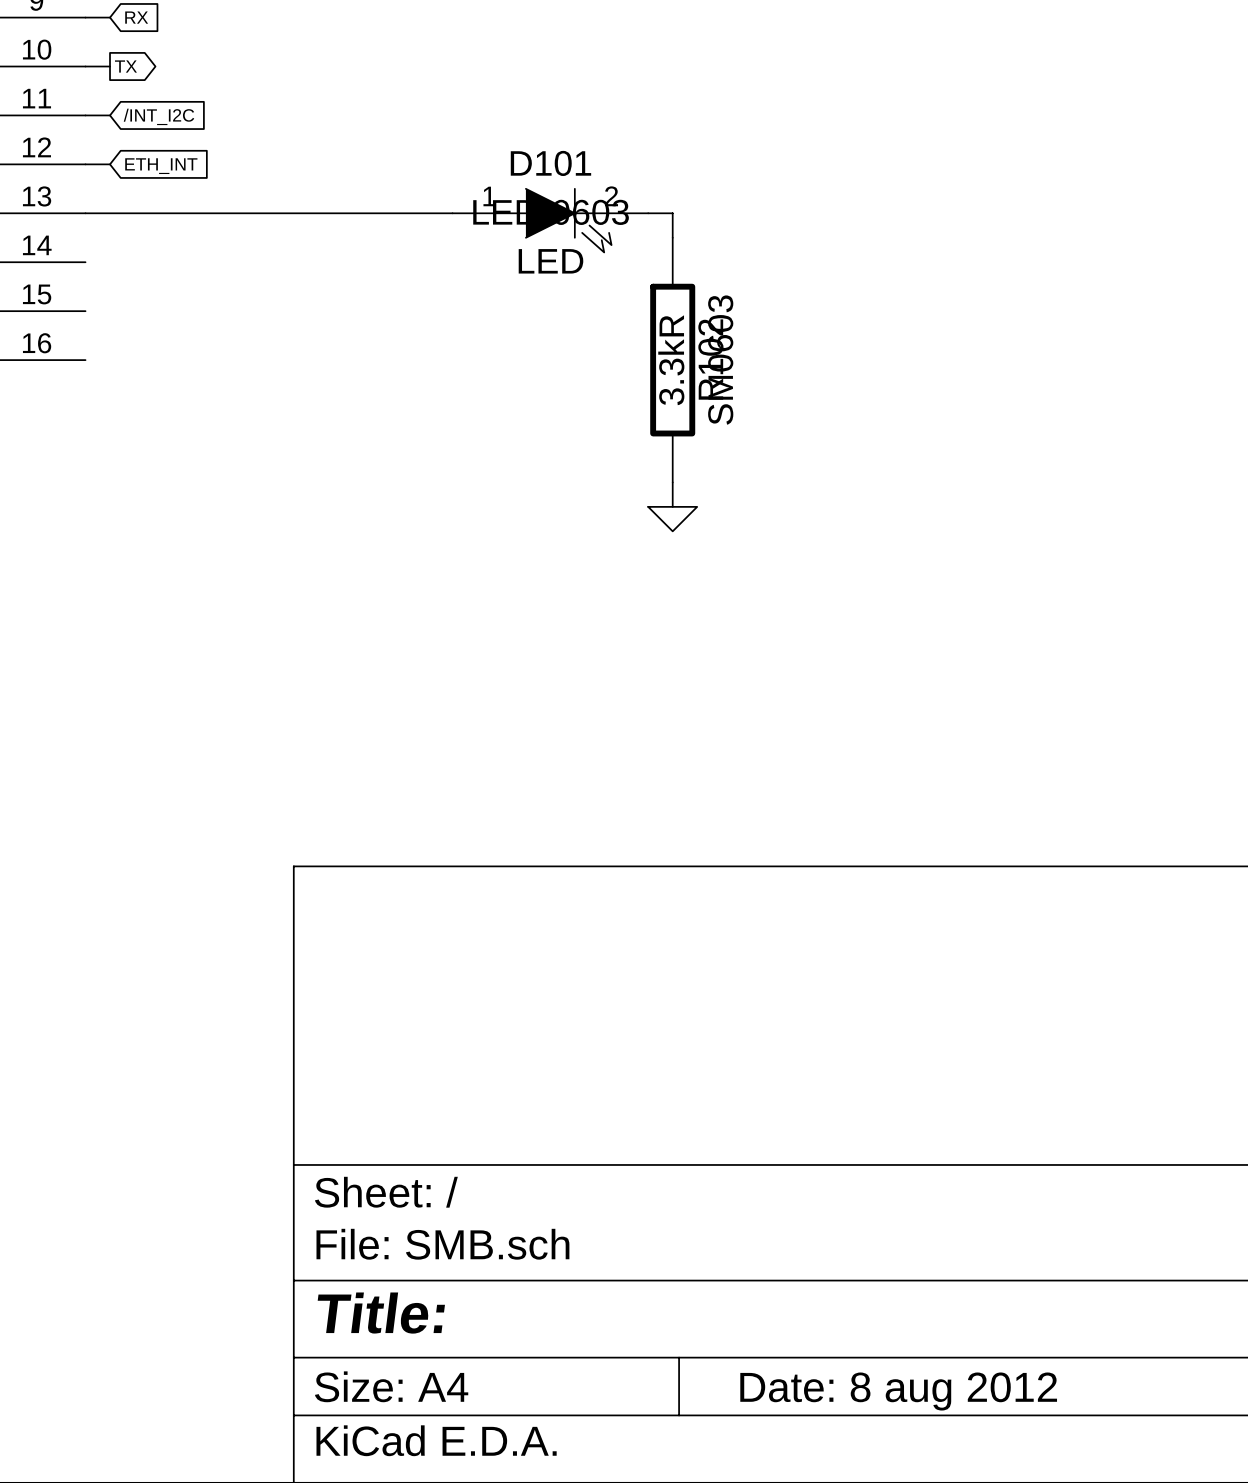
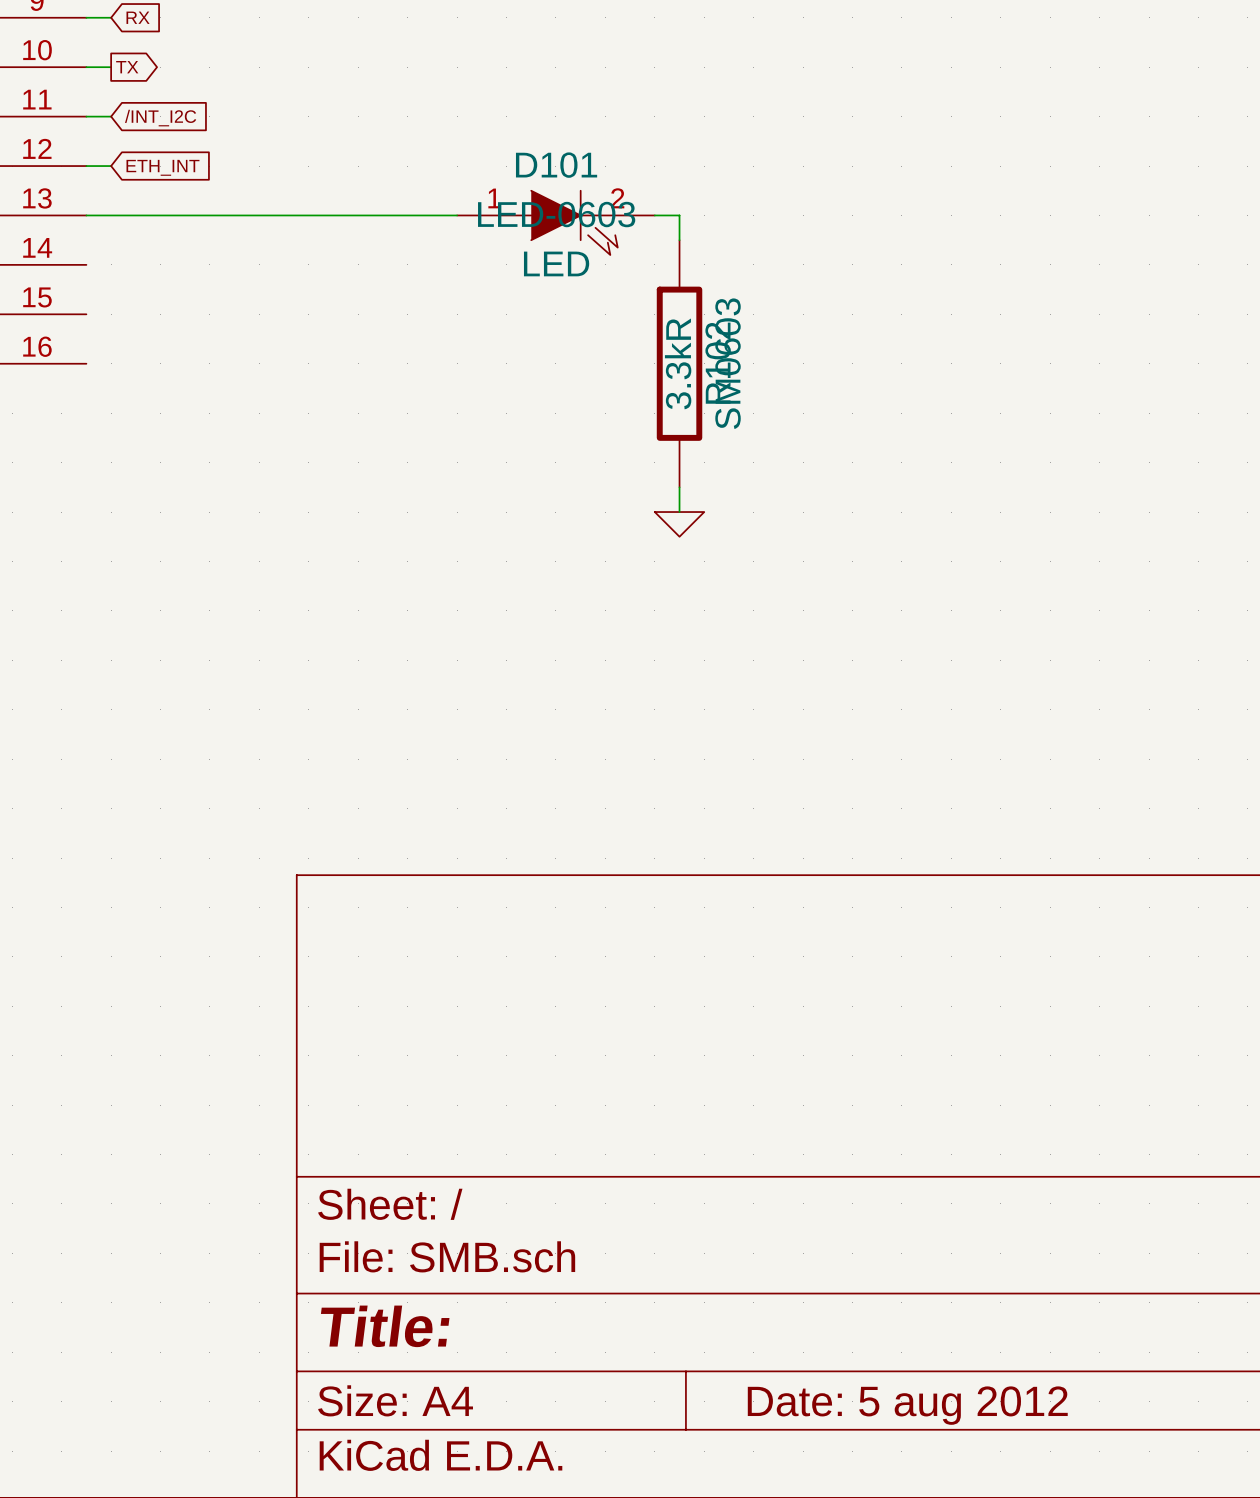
title block: Date: 8 aug 2012 (898, 1391) -> Date: 5 aug 2012 (907, 1405)

